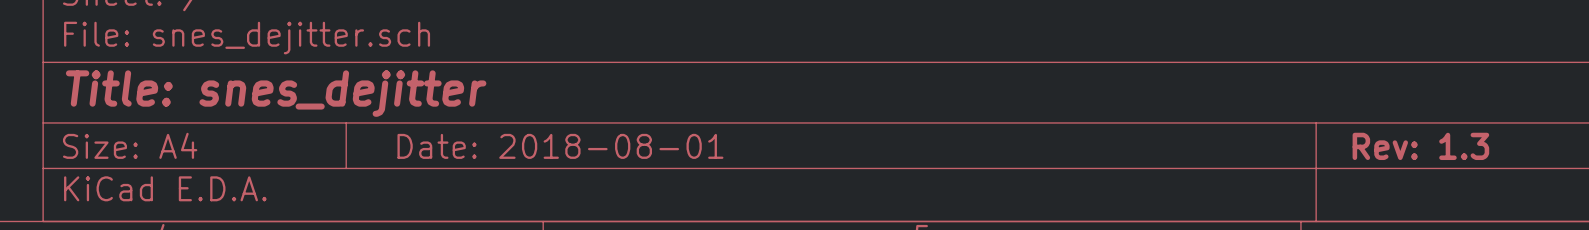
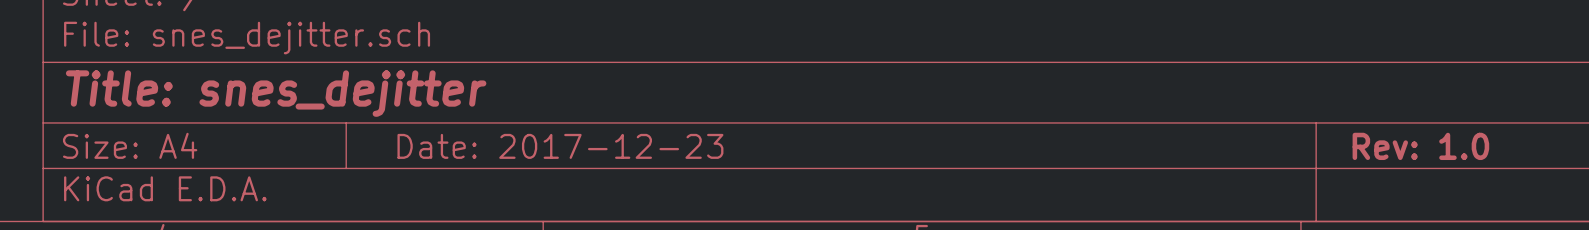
title block: Date: 2018-08-01 (560, 146) -> Date: 2017-12-23 (560, 146)
title block: Rev: 1.3 (1420, 146) -> Rev: 1.0 (1420, 146)

